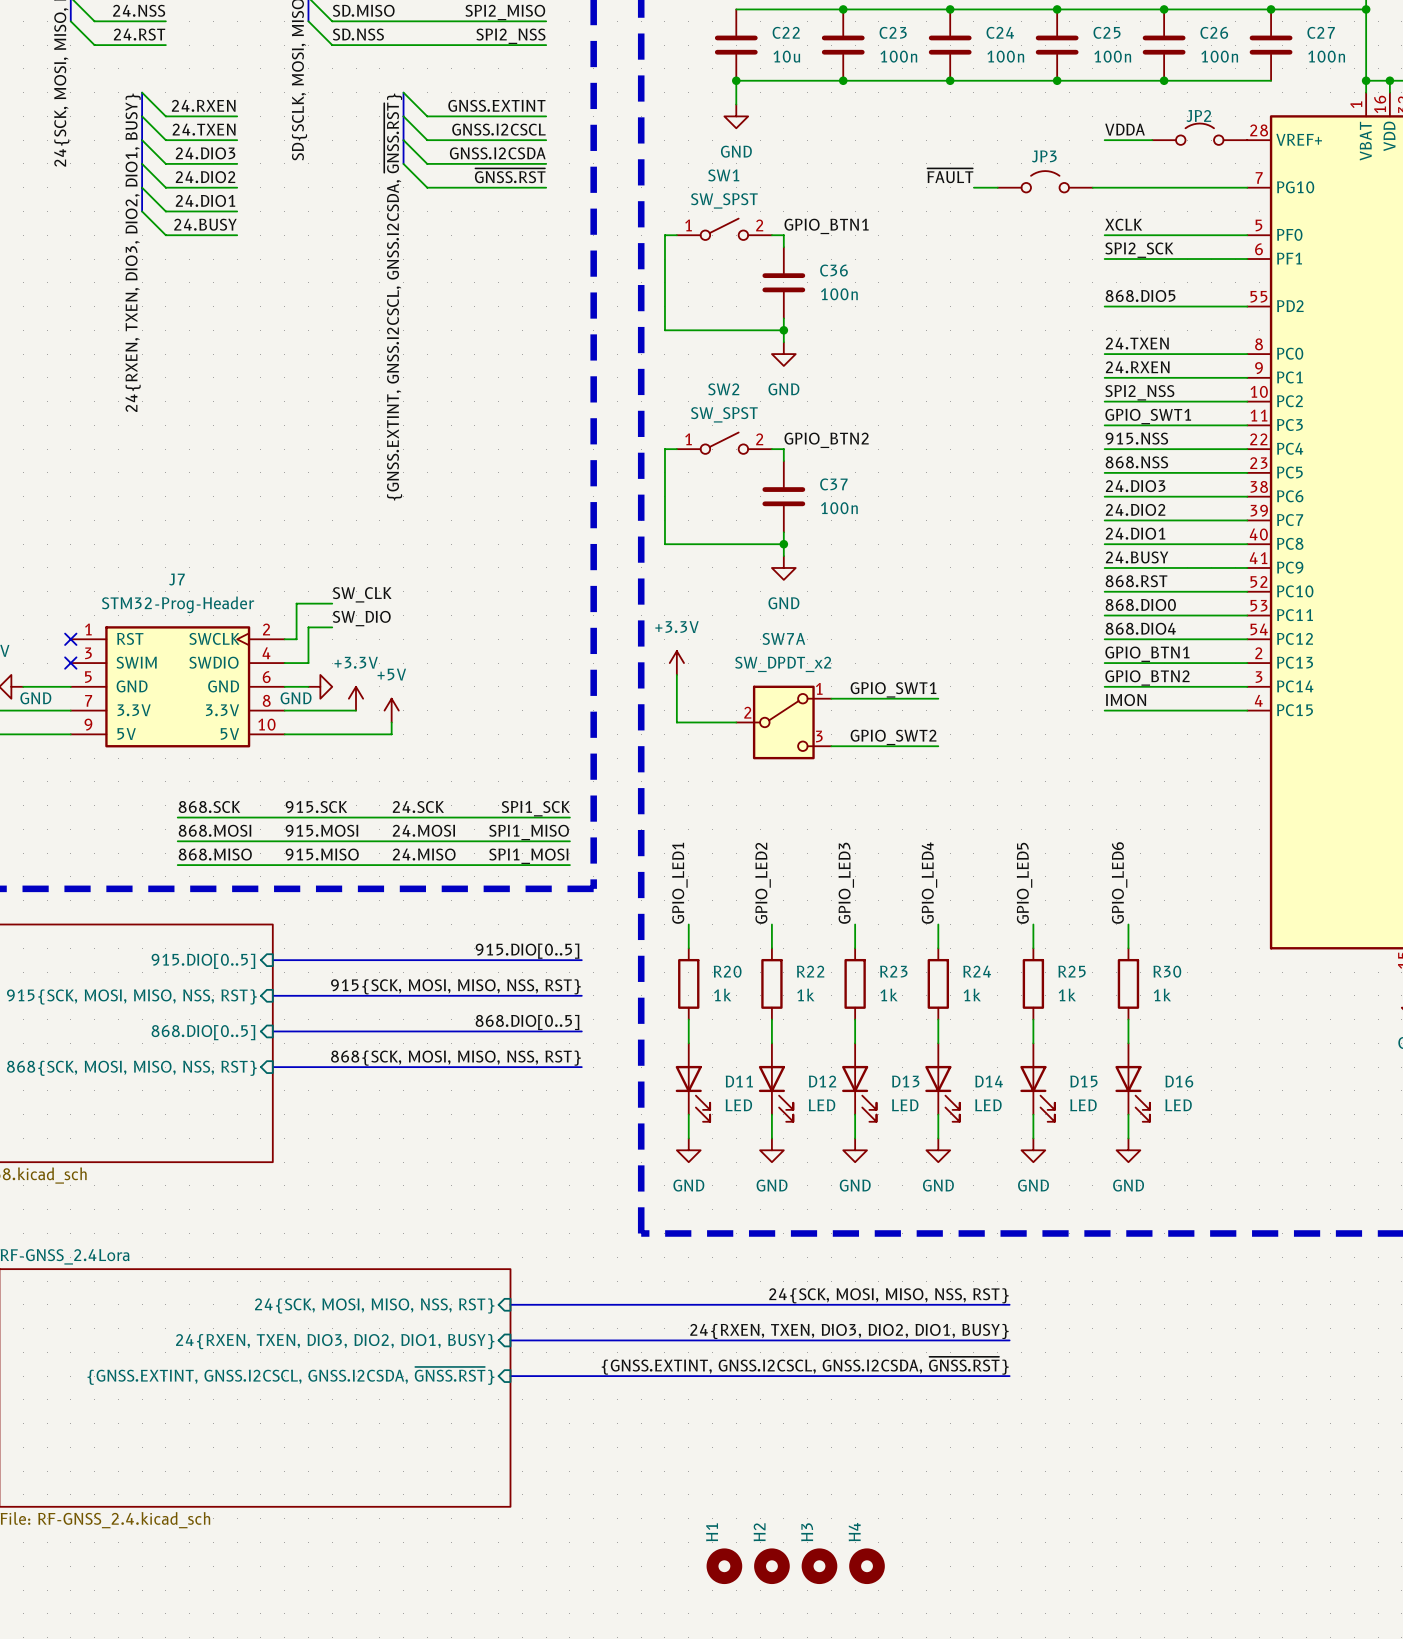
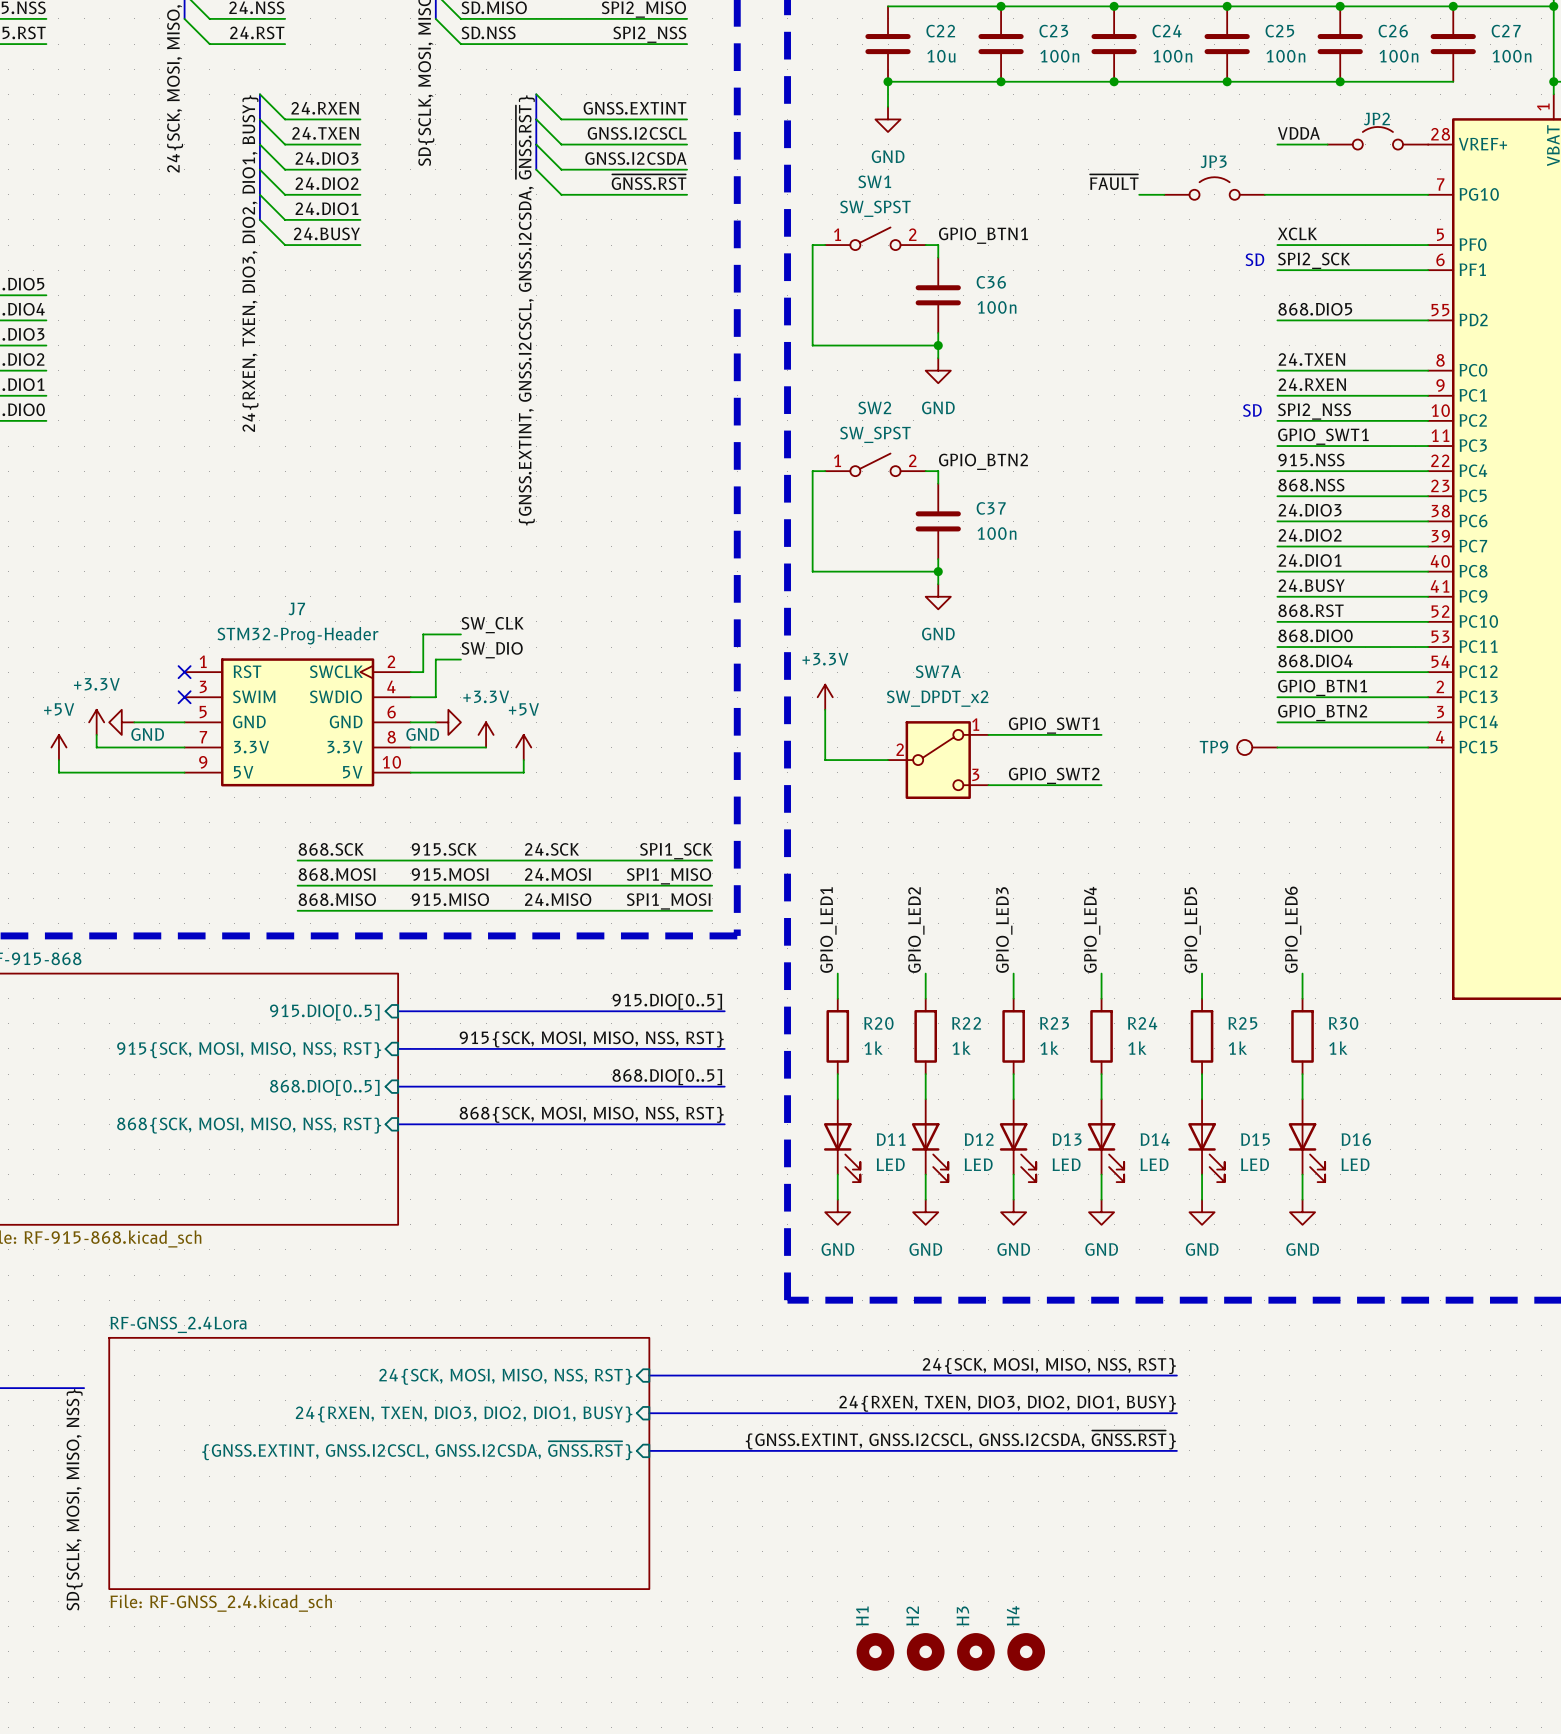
text: none -> SD (1254, 259)
text: none -> SD (1252, 410)
label: IMON (1126, 700) -> none
TP9: none -> (1257, 747)

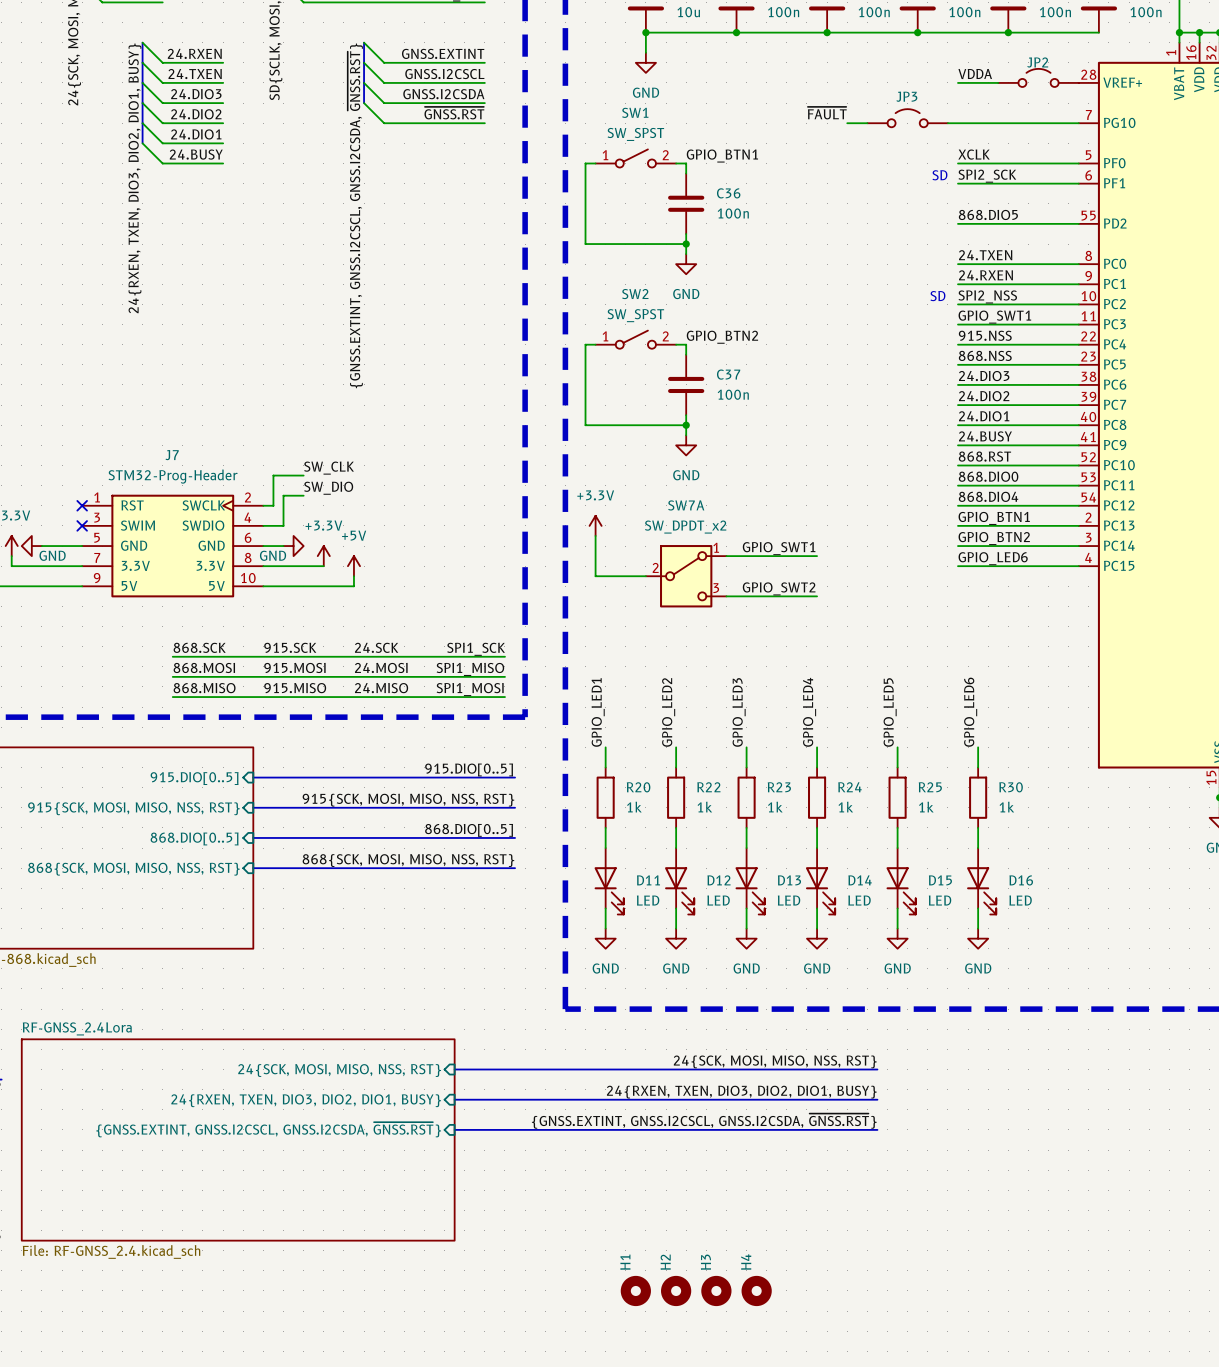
label: none -> GPIO_LED6 (993, 558)
TP9: (1257, 747) -> none

